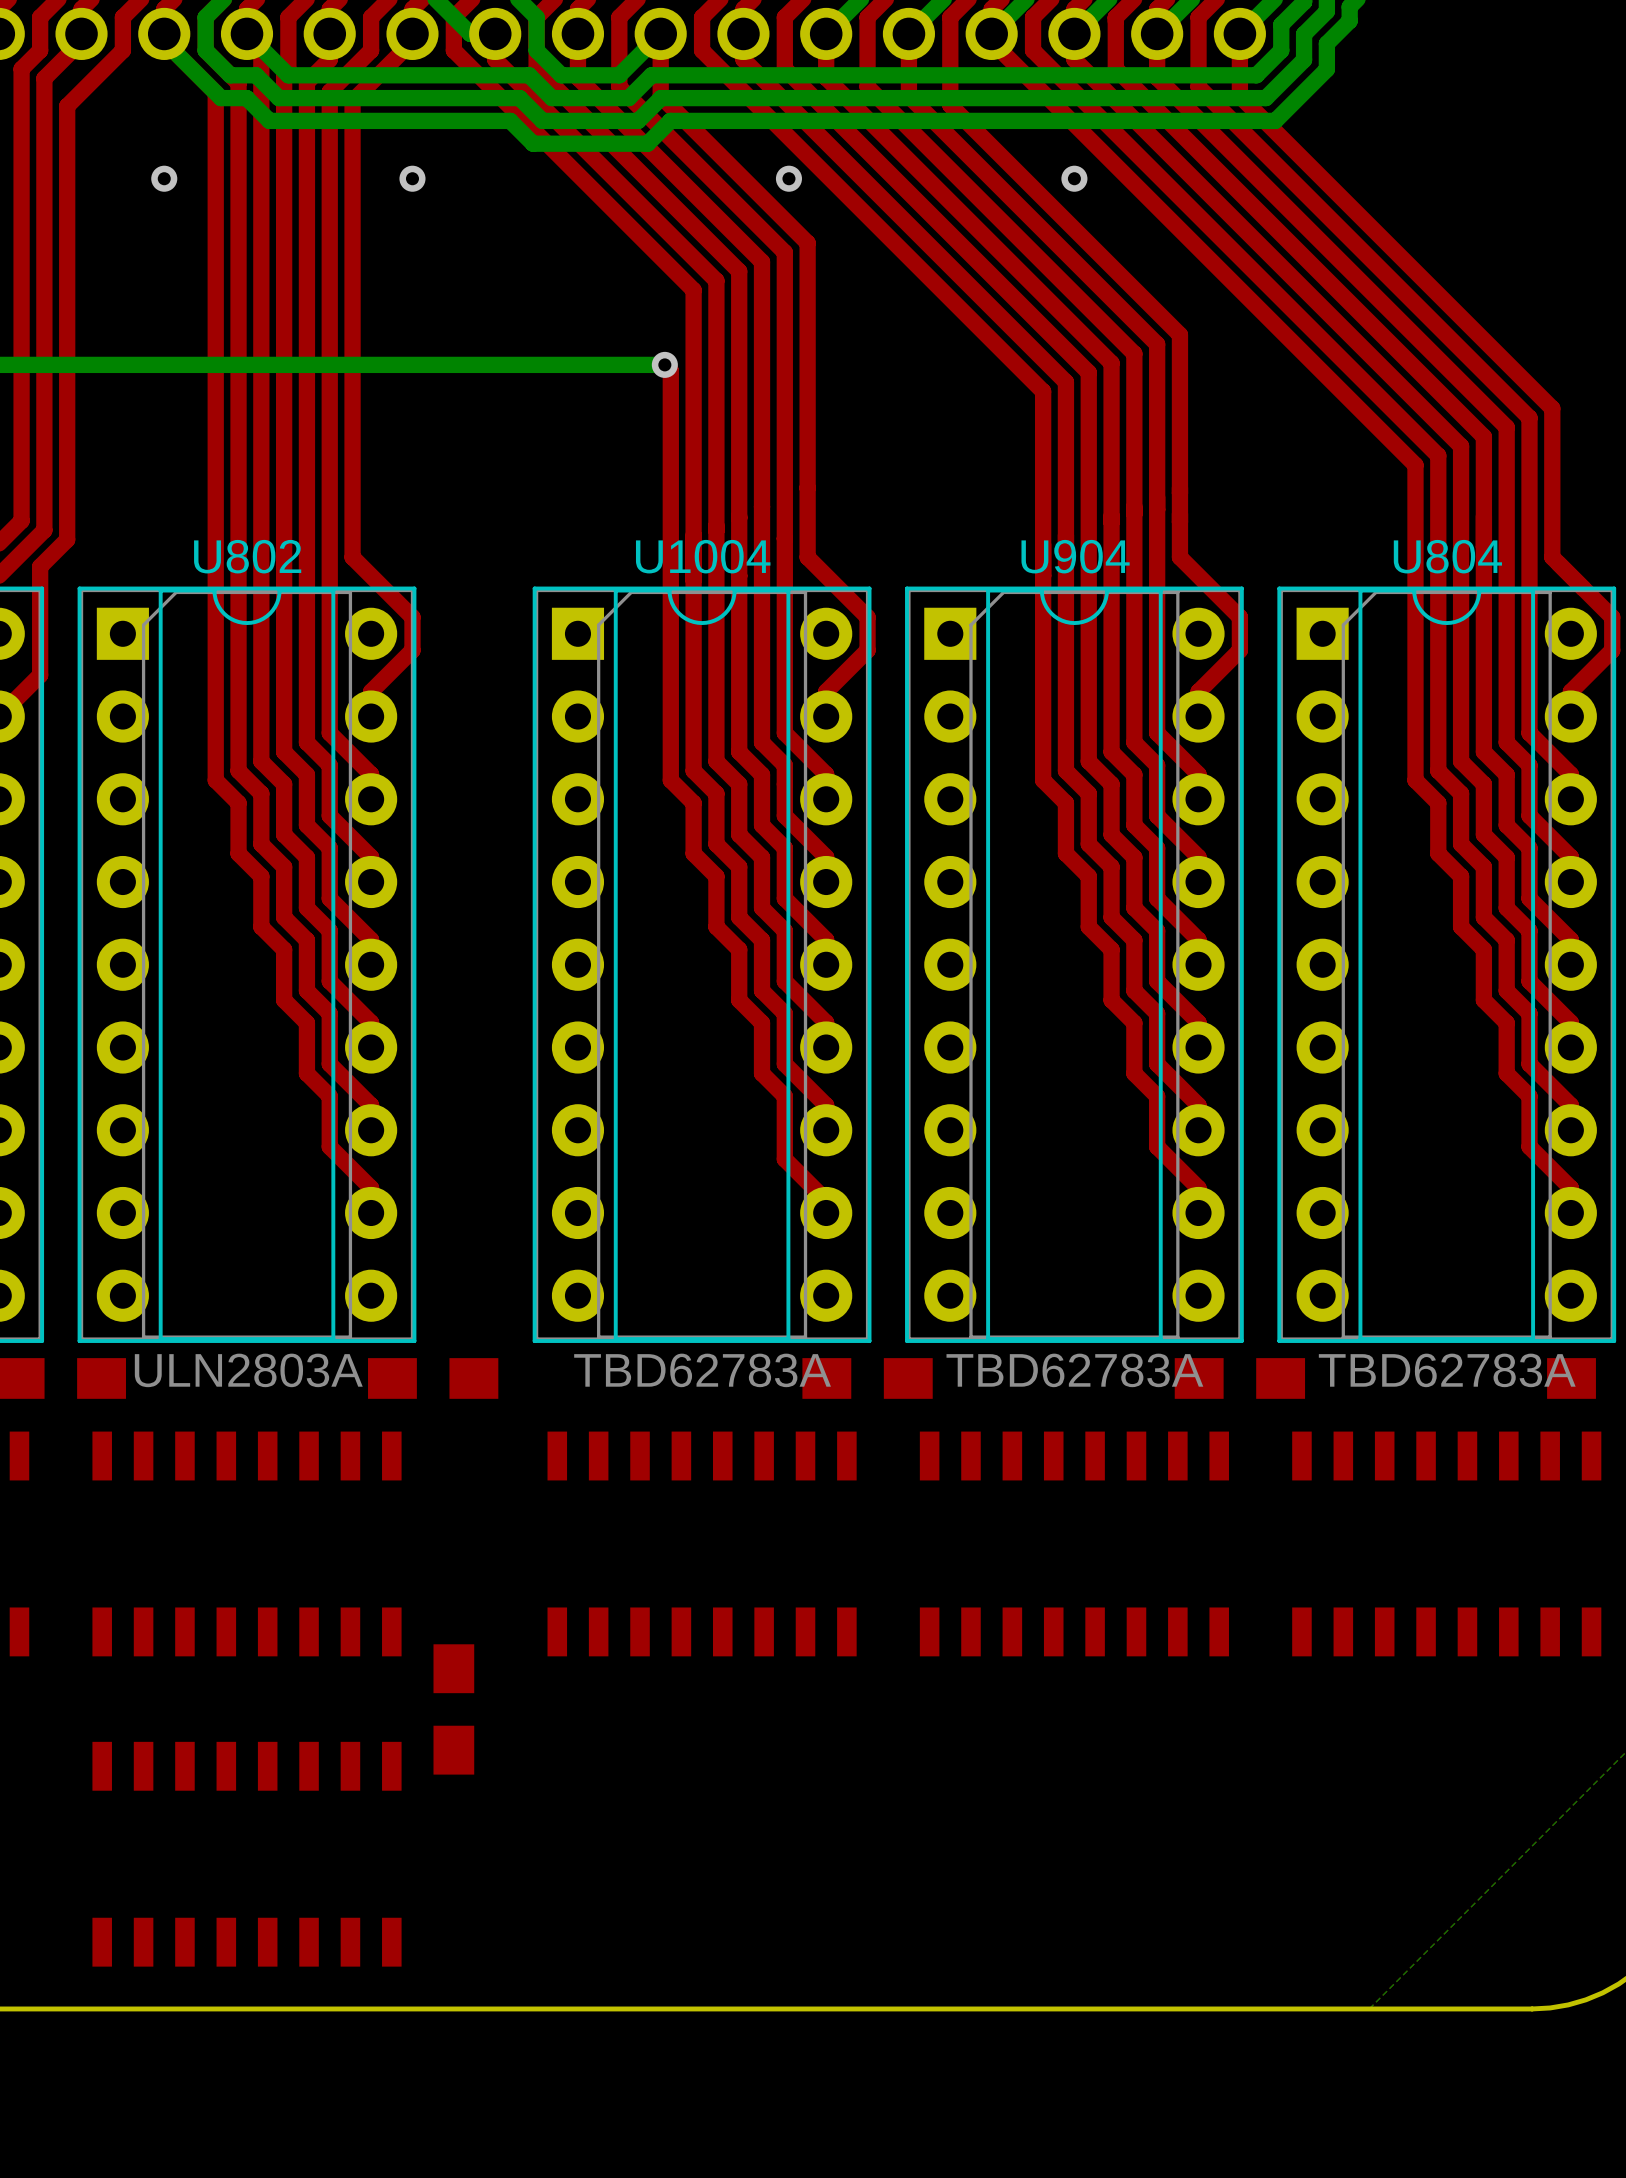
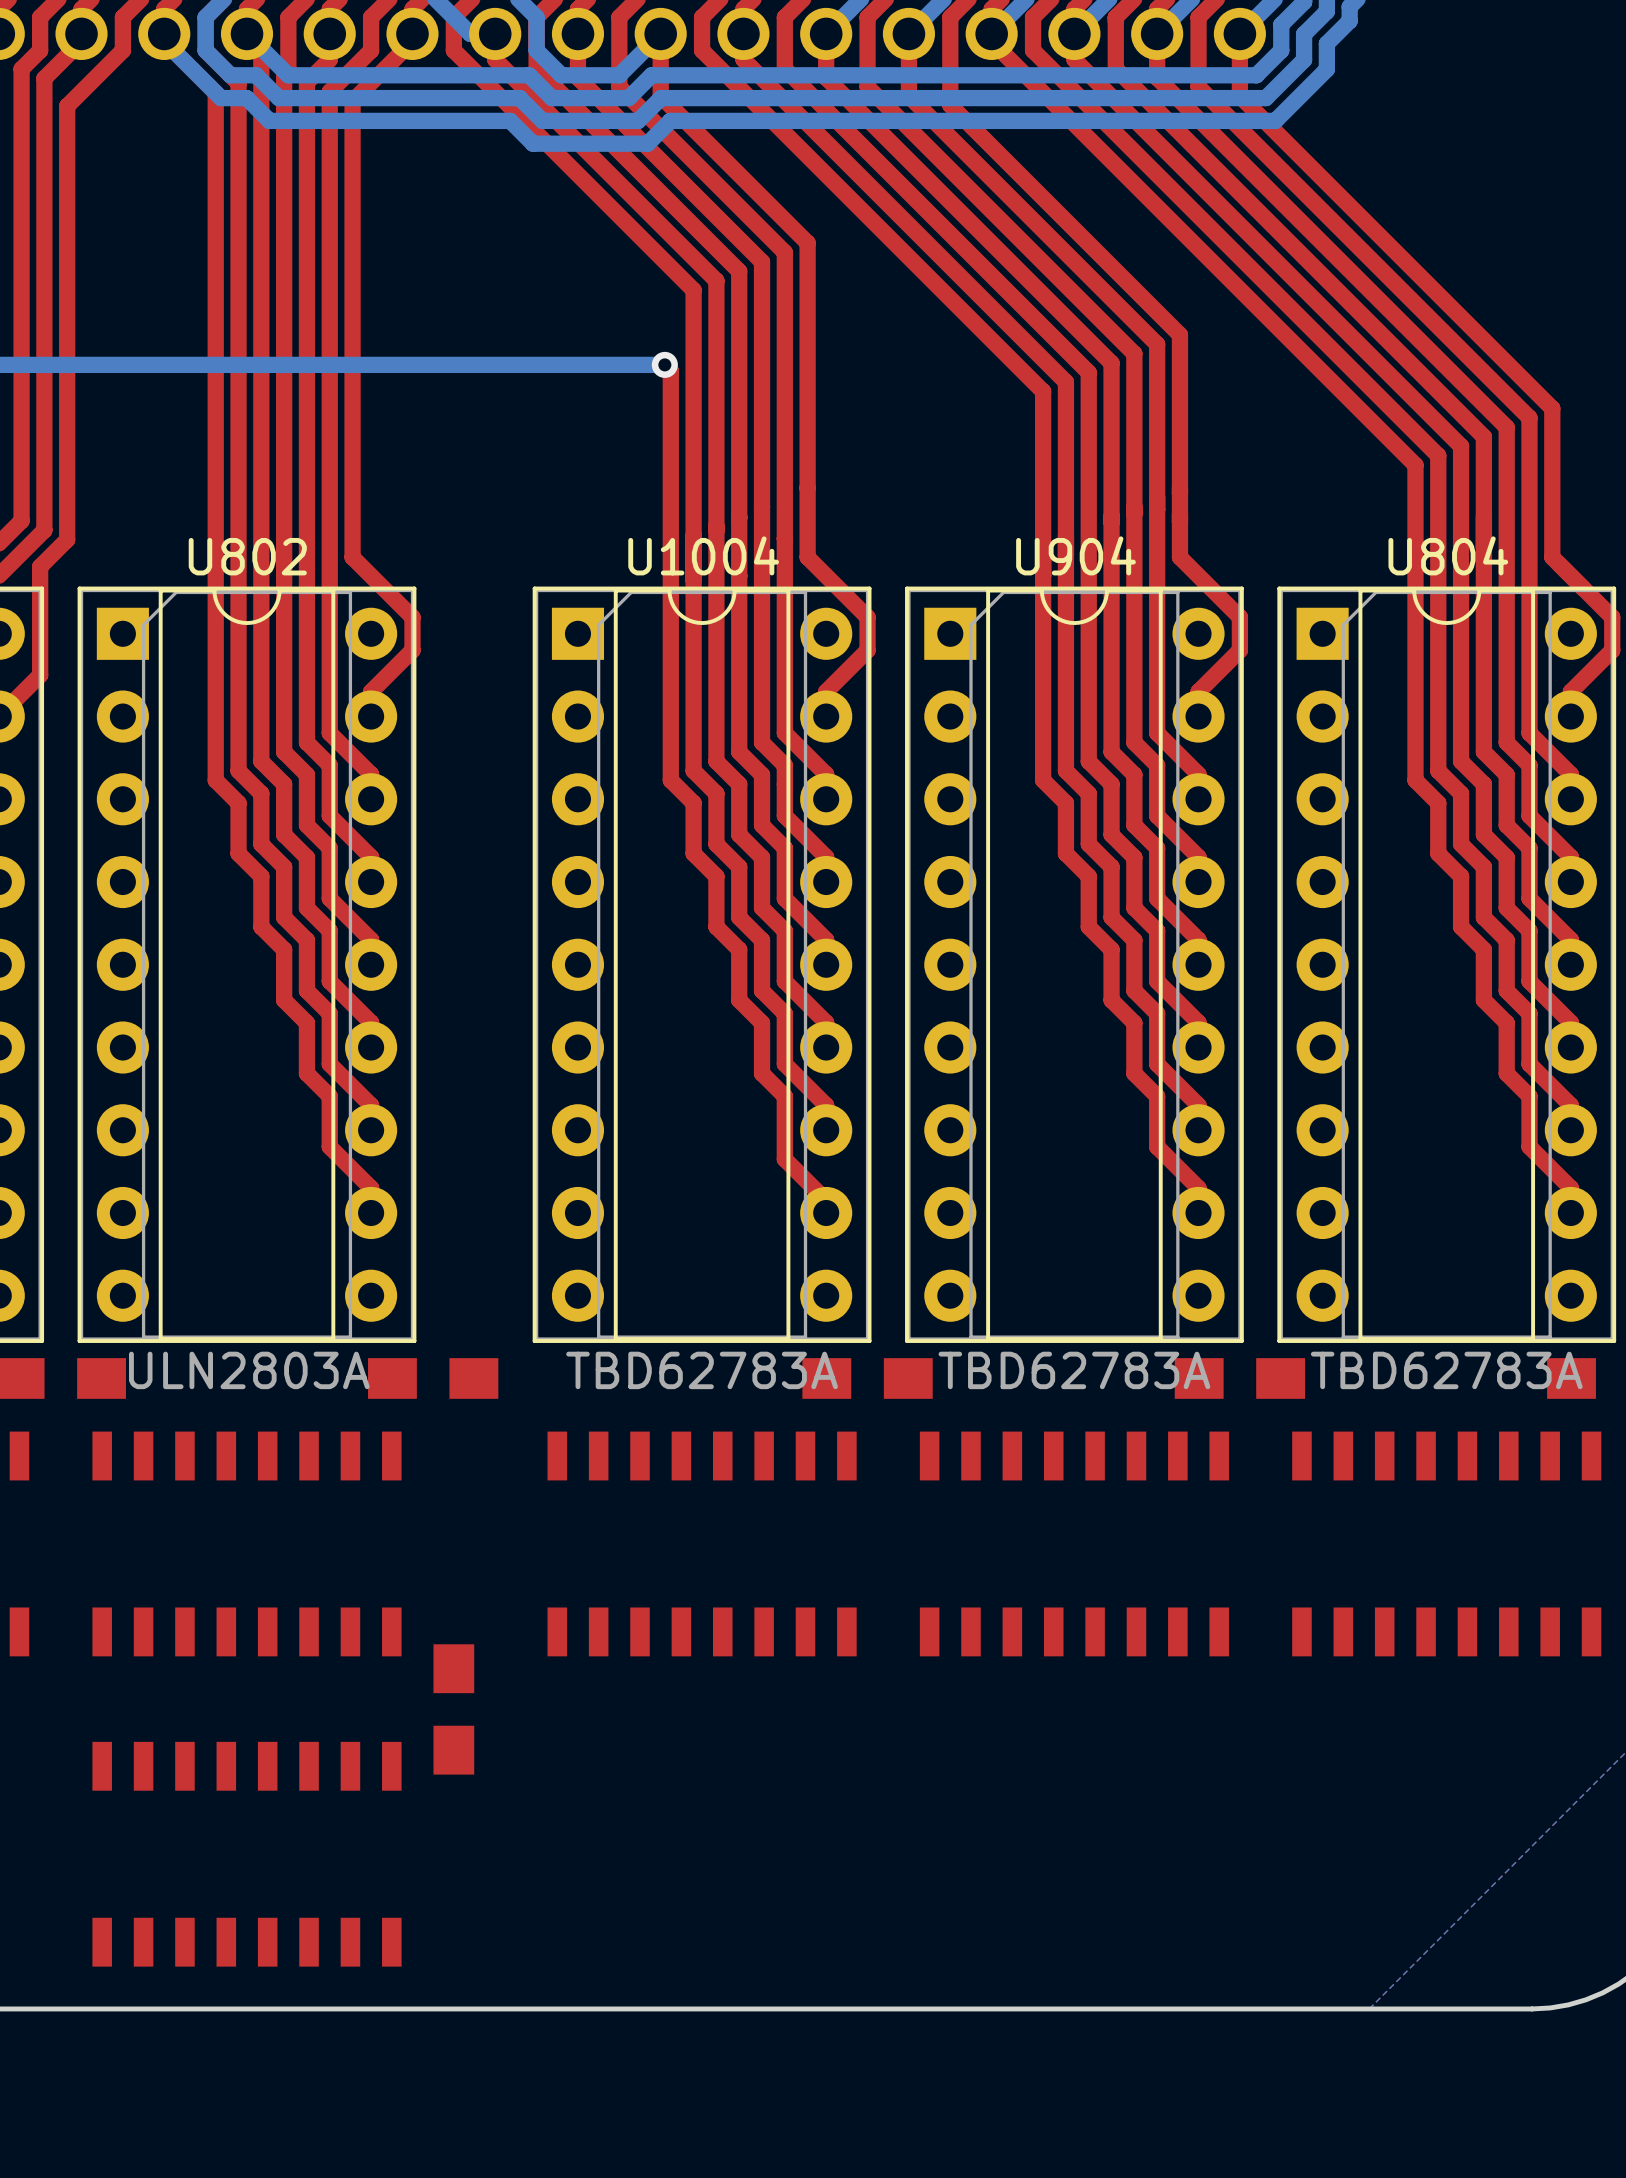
via: (164, 178) -> none
via: (412, 178) -> none
via: (788, 178) -> none
via: (1074, 178) -> none

